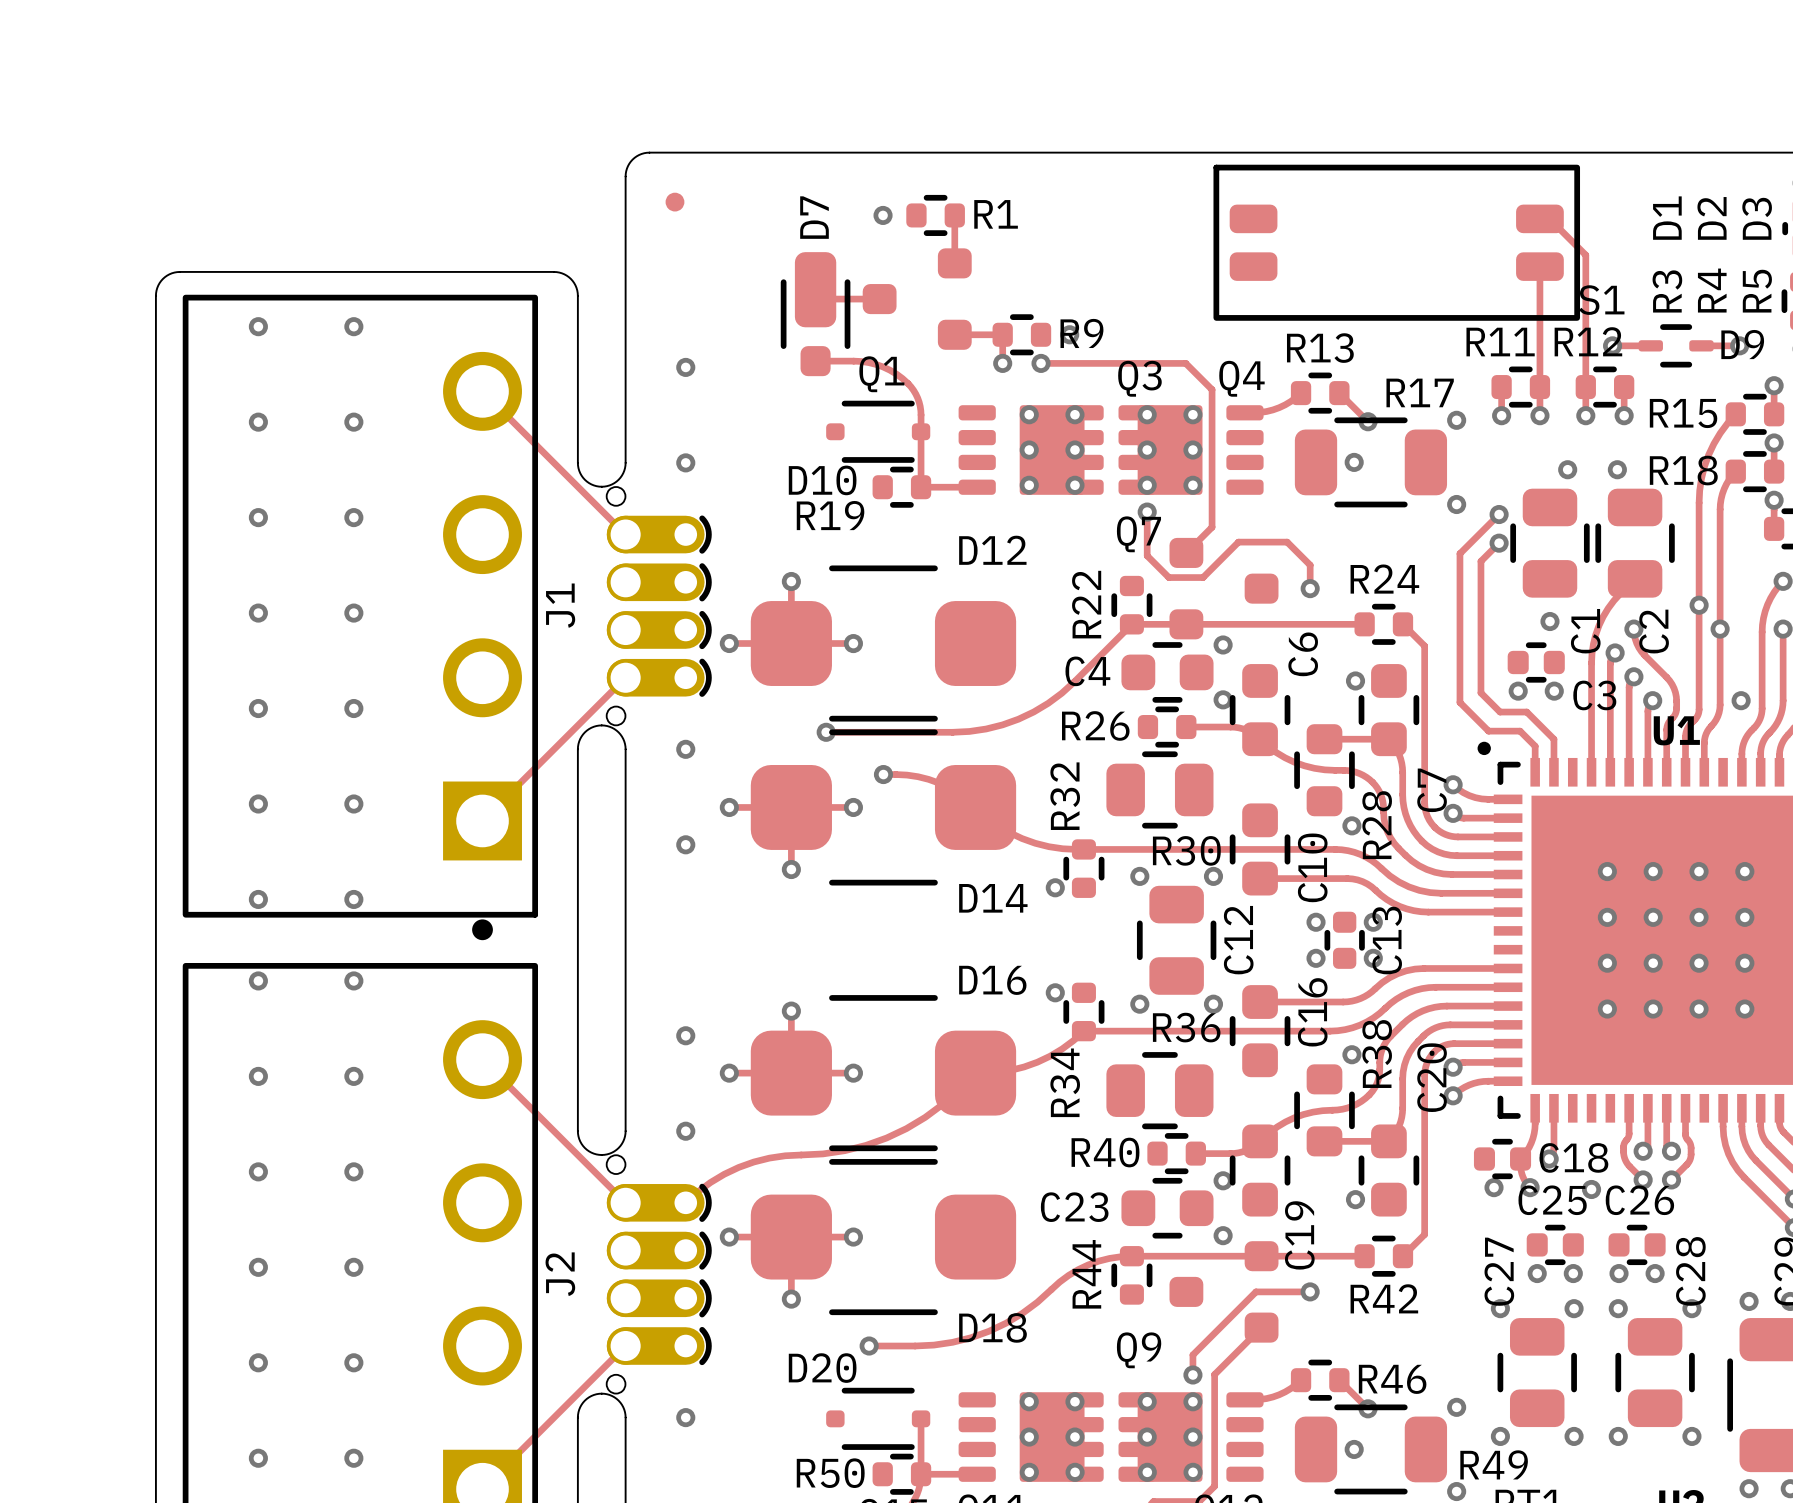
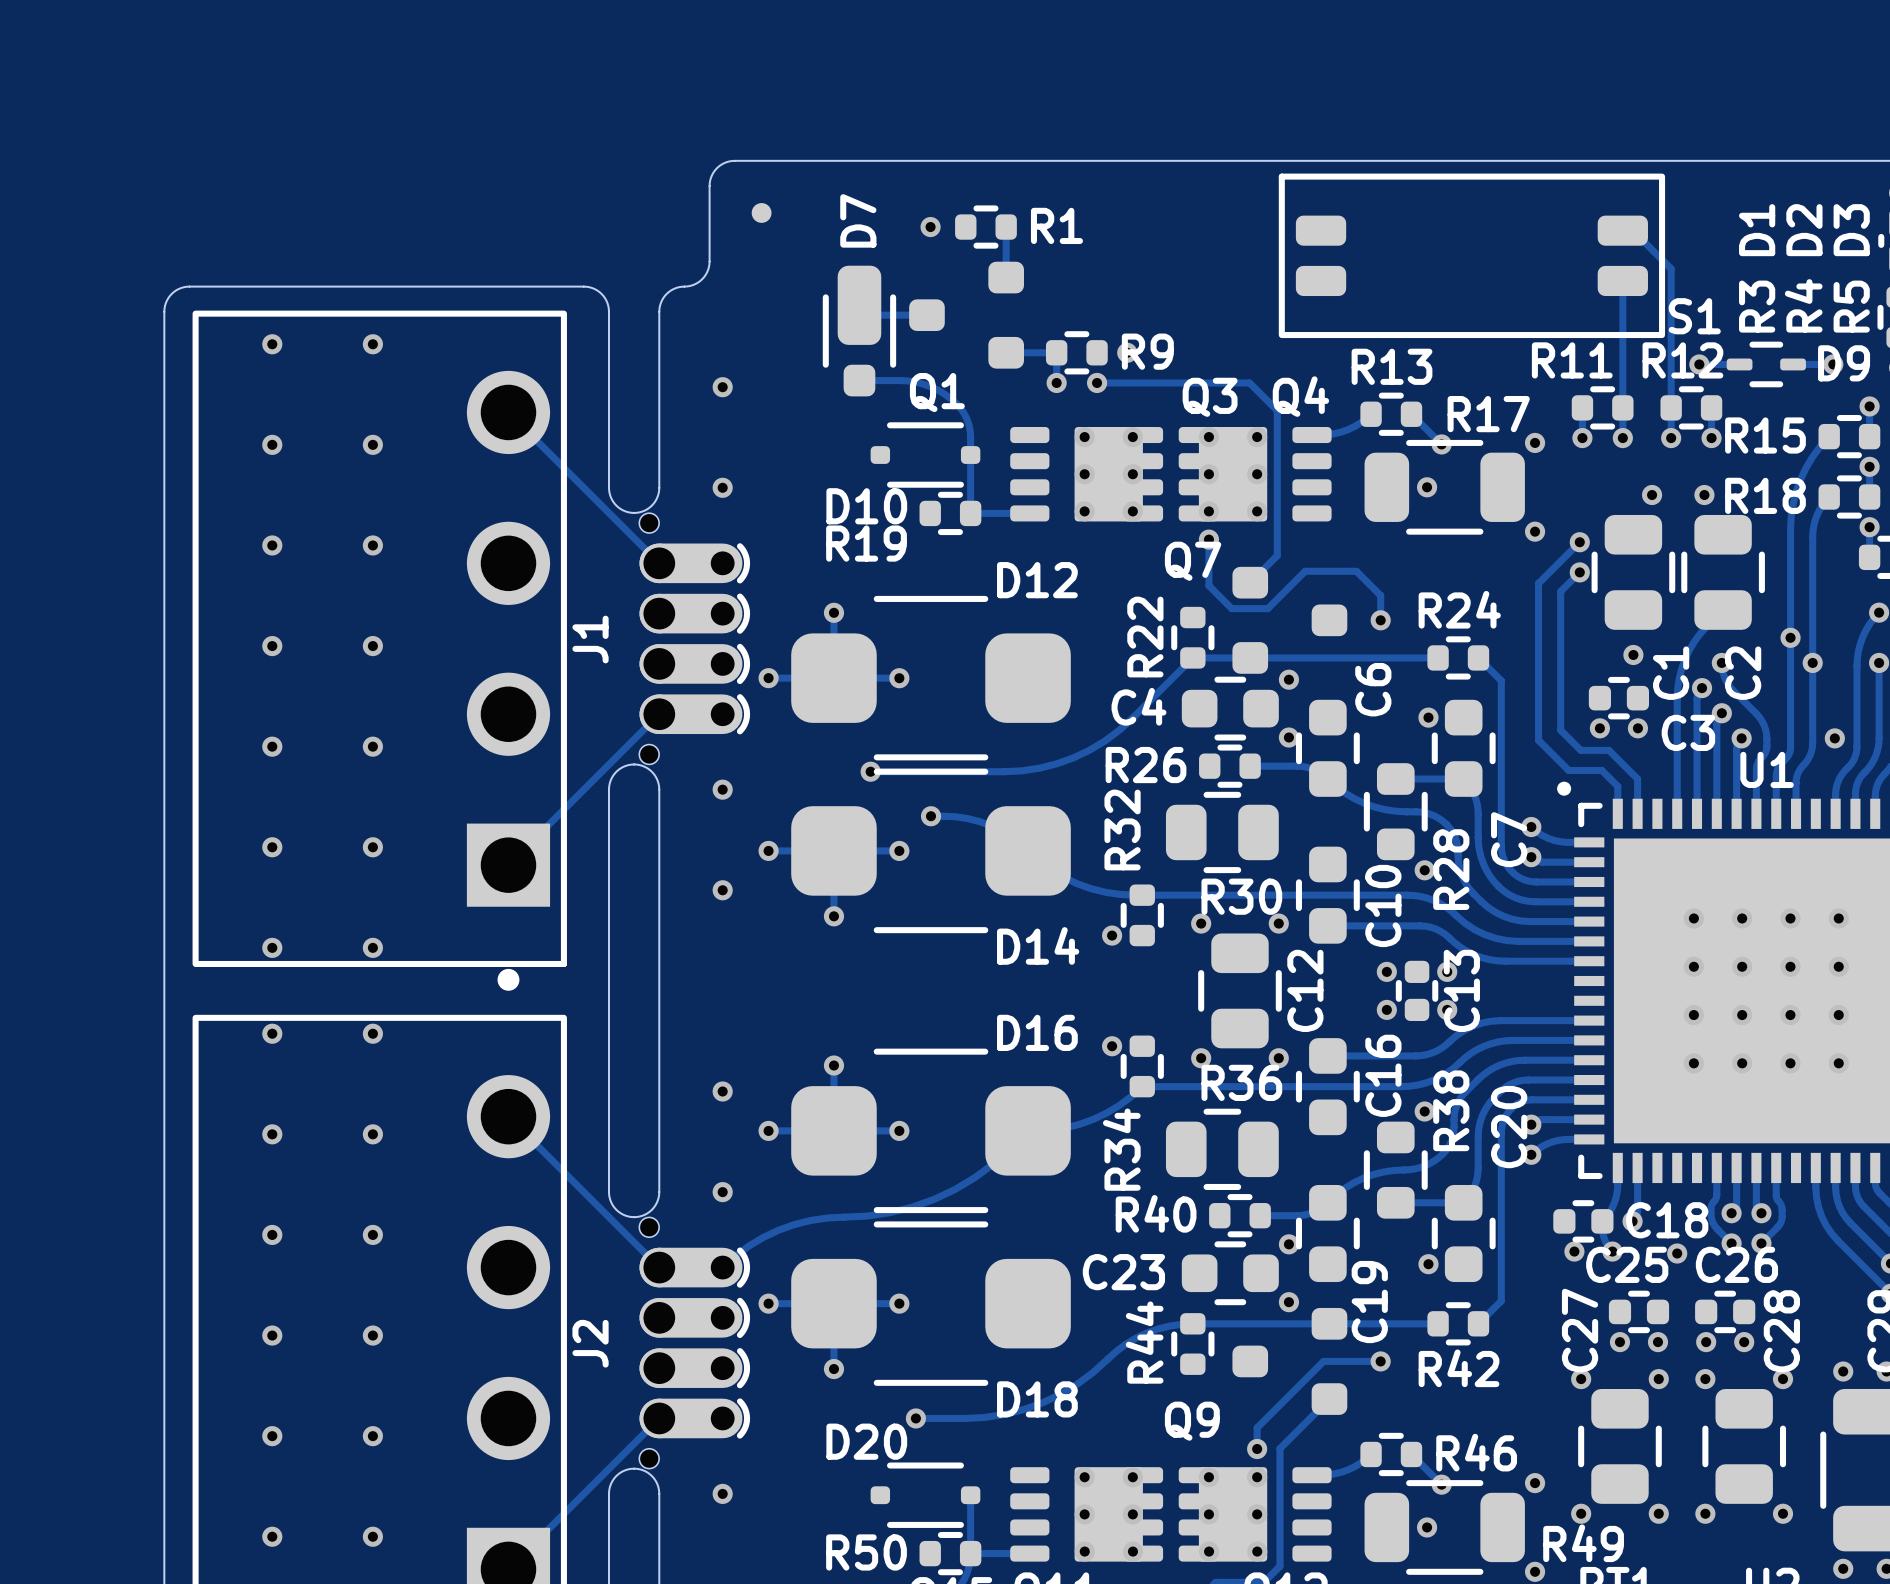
board edge: (697, 152) (644, 153) (634, 157) (627, 166) (625, 176) (625, 295) -> (734, 160) (719, 166) (710, 180) (709, 261) (707, 272) (695, 284) (676, 288) (668, 292) (661, 300) (659, 311)
part position: (674, 202) -> (761, 212)

